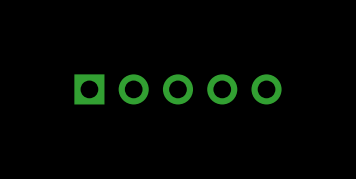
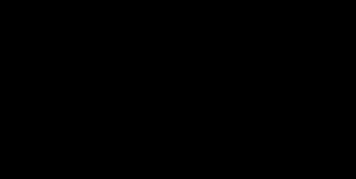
part: (177, 89) -> none

